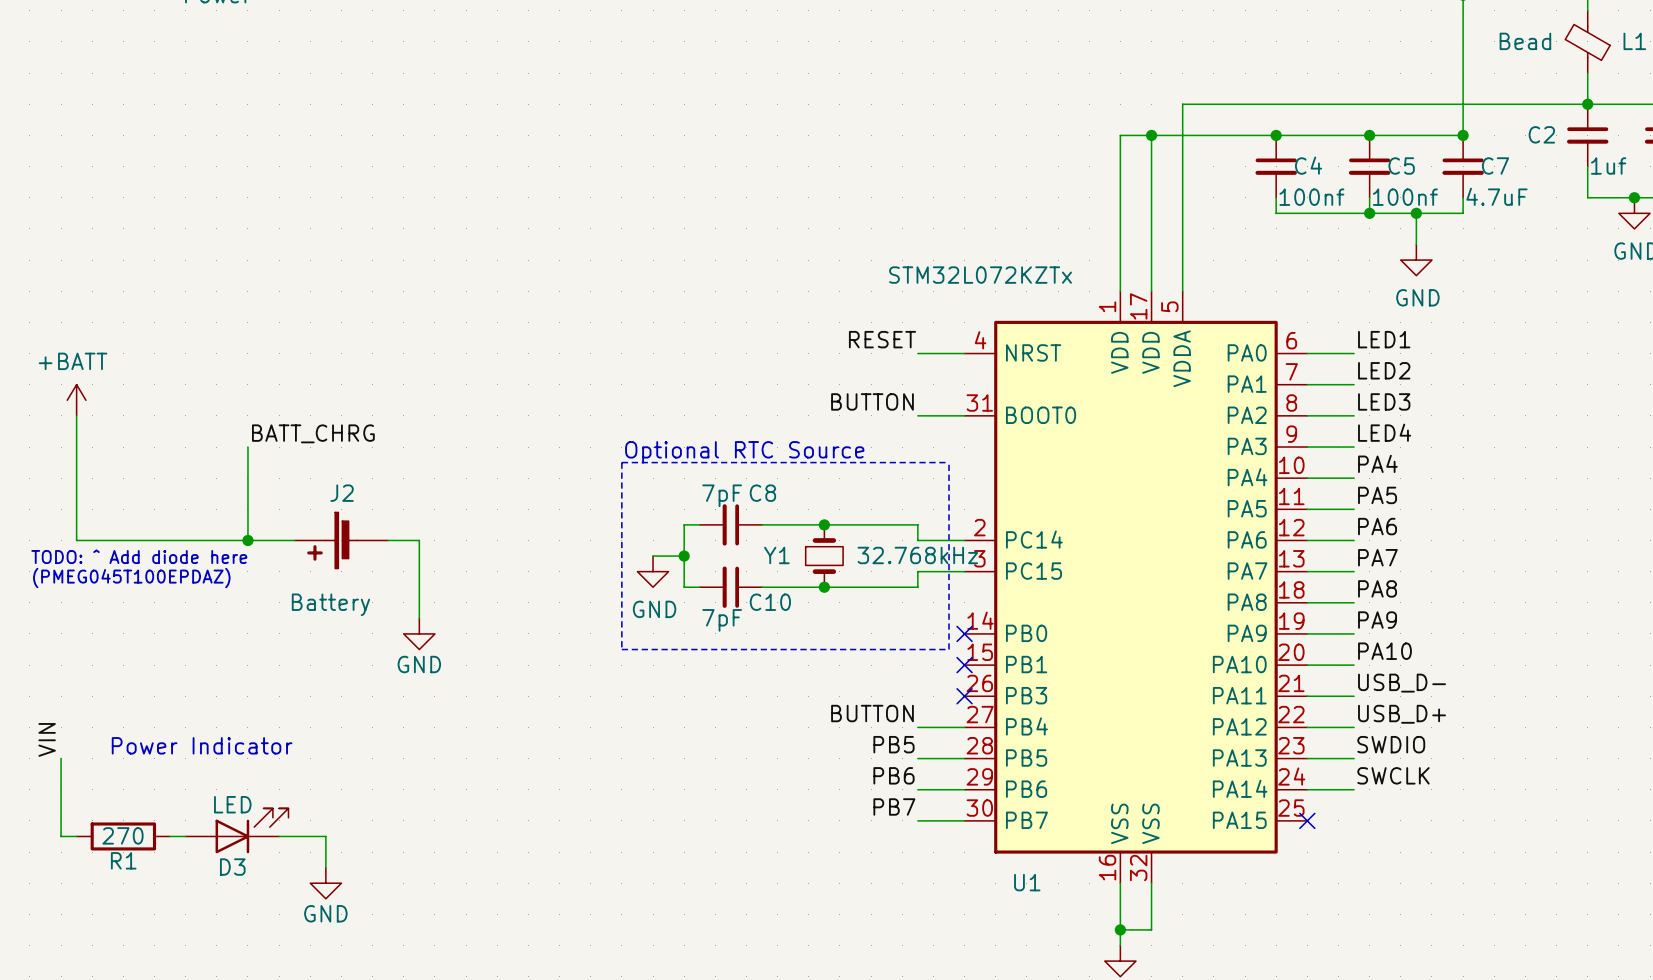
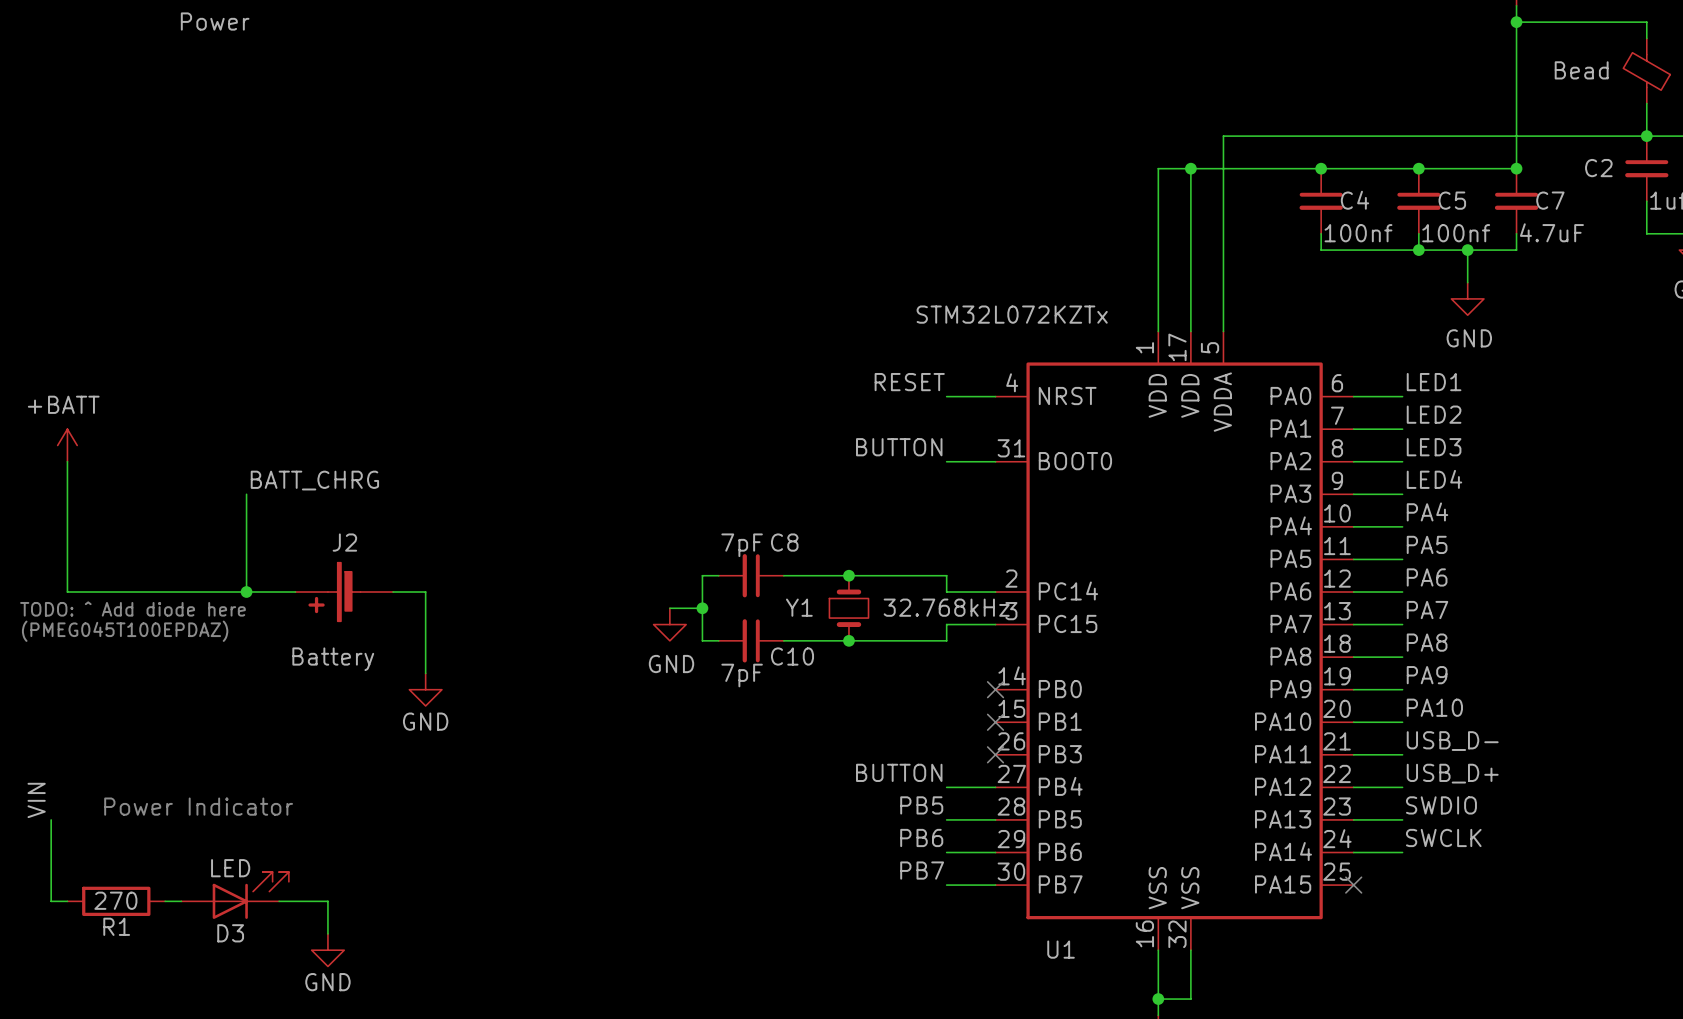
text: Optional RTC Source (744, 452) -> none
line: (621, 462) (621, 649) (949, 649) (949, 462) (621, 462) -> none

